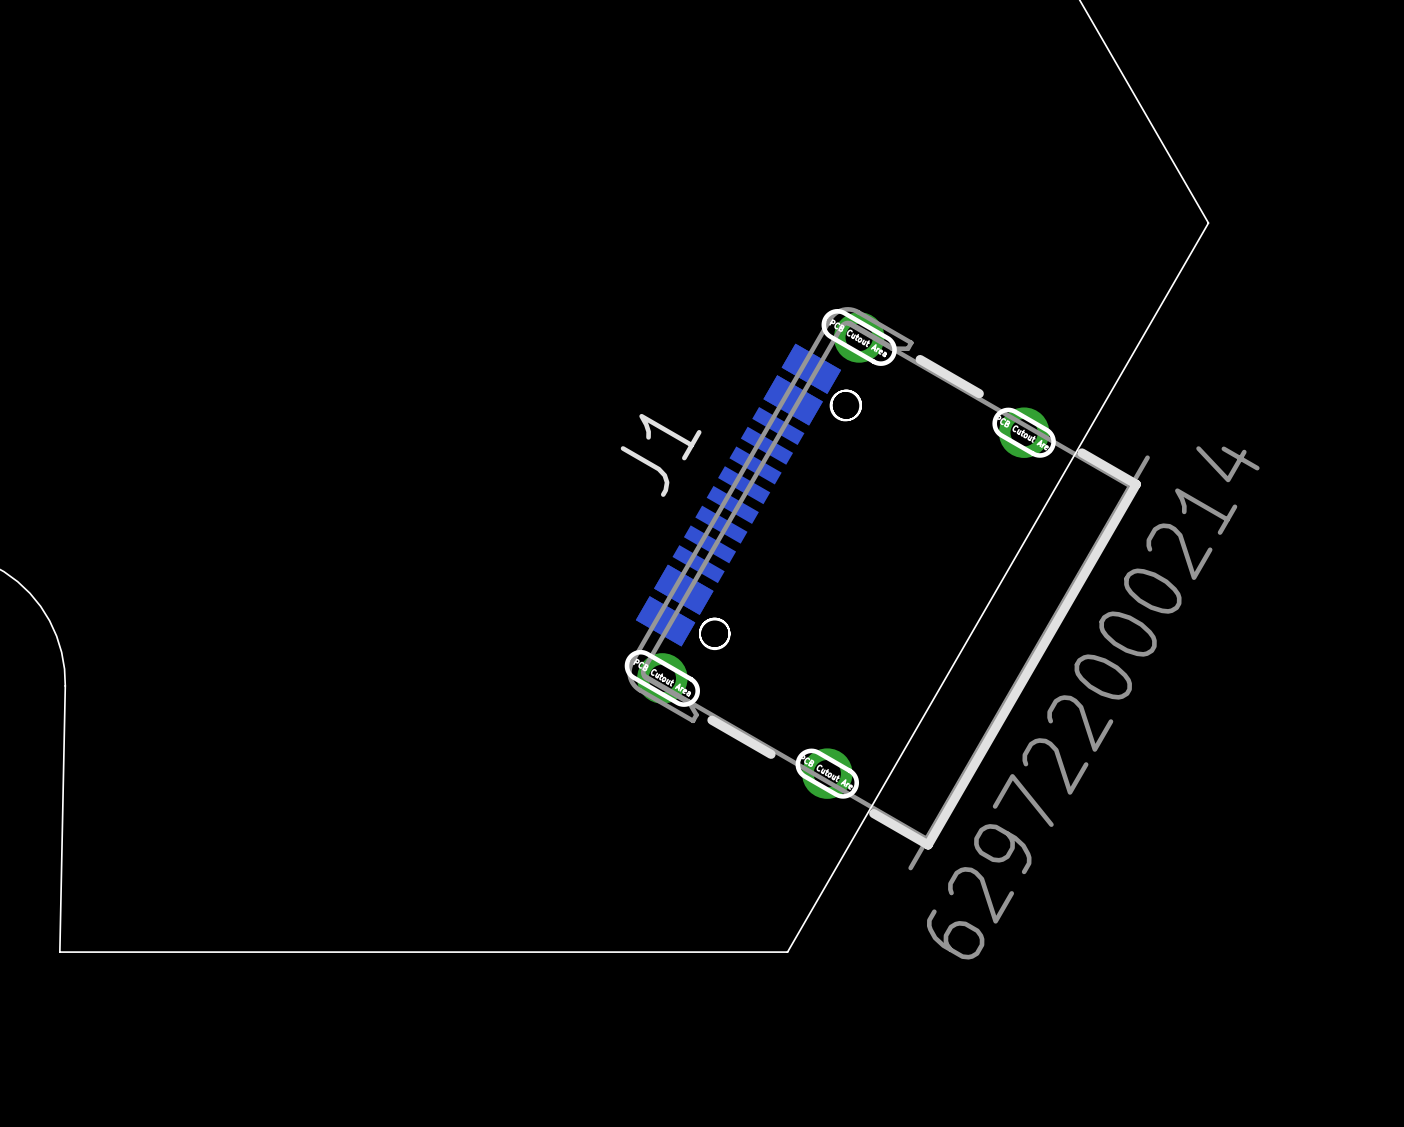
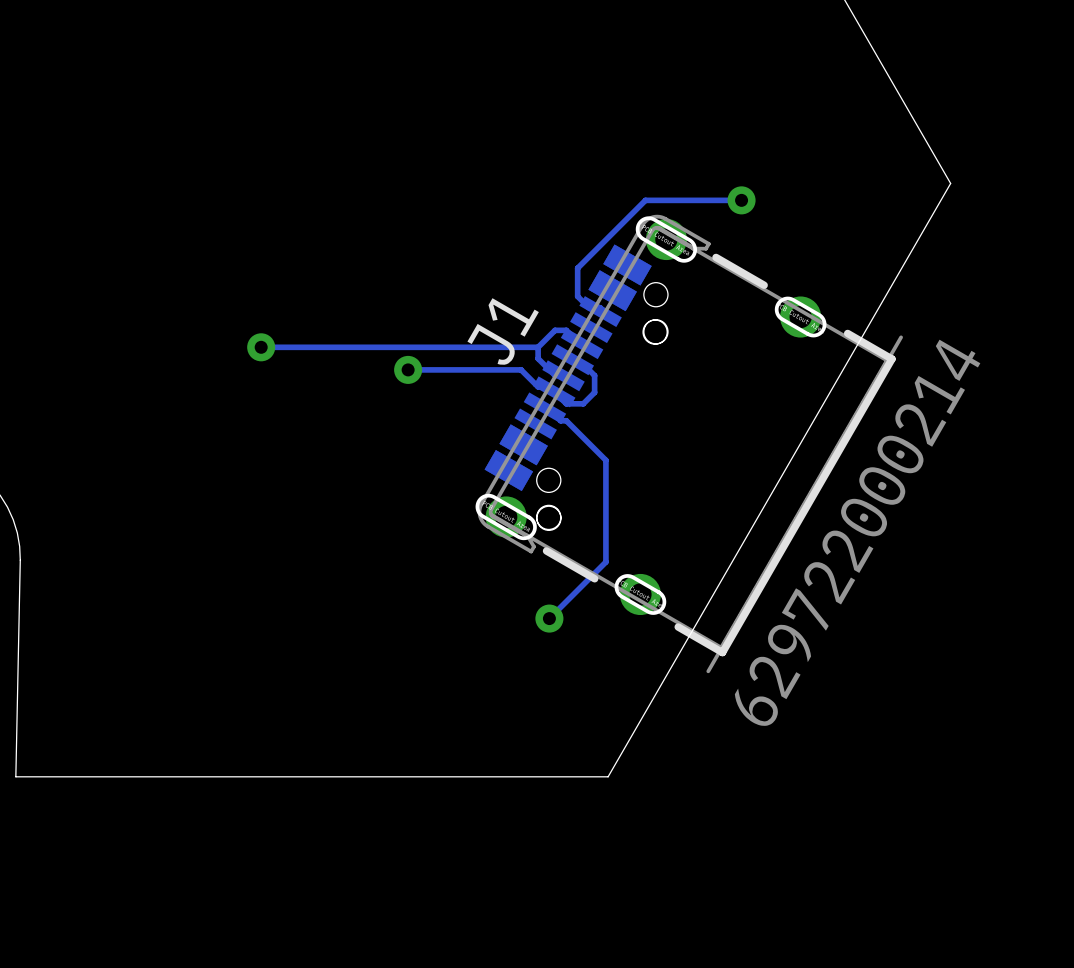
track: none -> (741, 200) (645, 200) (577, 268) (577, 296) (588, 307) (600, 307) (600, 311)
via: none -> (741, 200)
track: none -> (582, 343) (566, 330) (555, 330) (538, 347)
via: none -> (261, 347)
track: none -> (538, 347) (538, 358) (555, 375) (563, 375)
track: none -> (538, 347) (261, 347)
track: none -> (572, 359) (577, 364) (583, 364) (594, 375) (594, 392) (583, 403) (566, 403) (549, 386) (538, 386) (521, 369) (408, 369)
via: none -> (408, 369)
track: none -> (544, 407) (549, 409) (560, 420) (566, 420) (605, 460) (605, 562) (549, 618)
J1 position: (887, 588) -> (689, 443)
via: none -> (549, 618)

